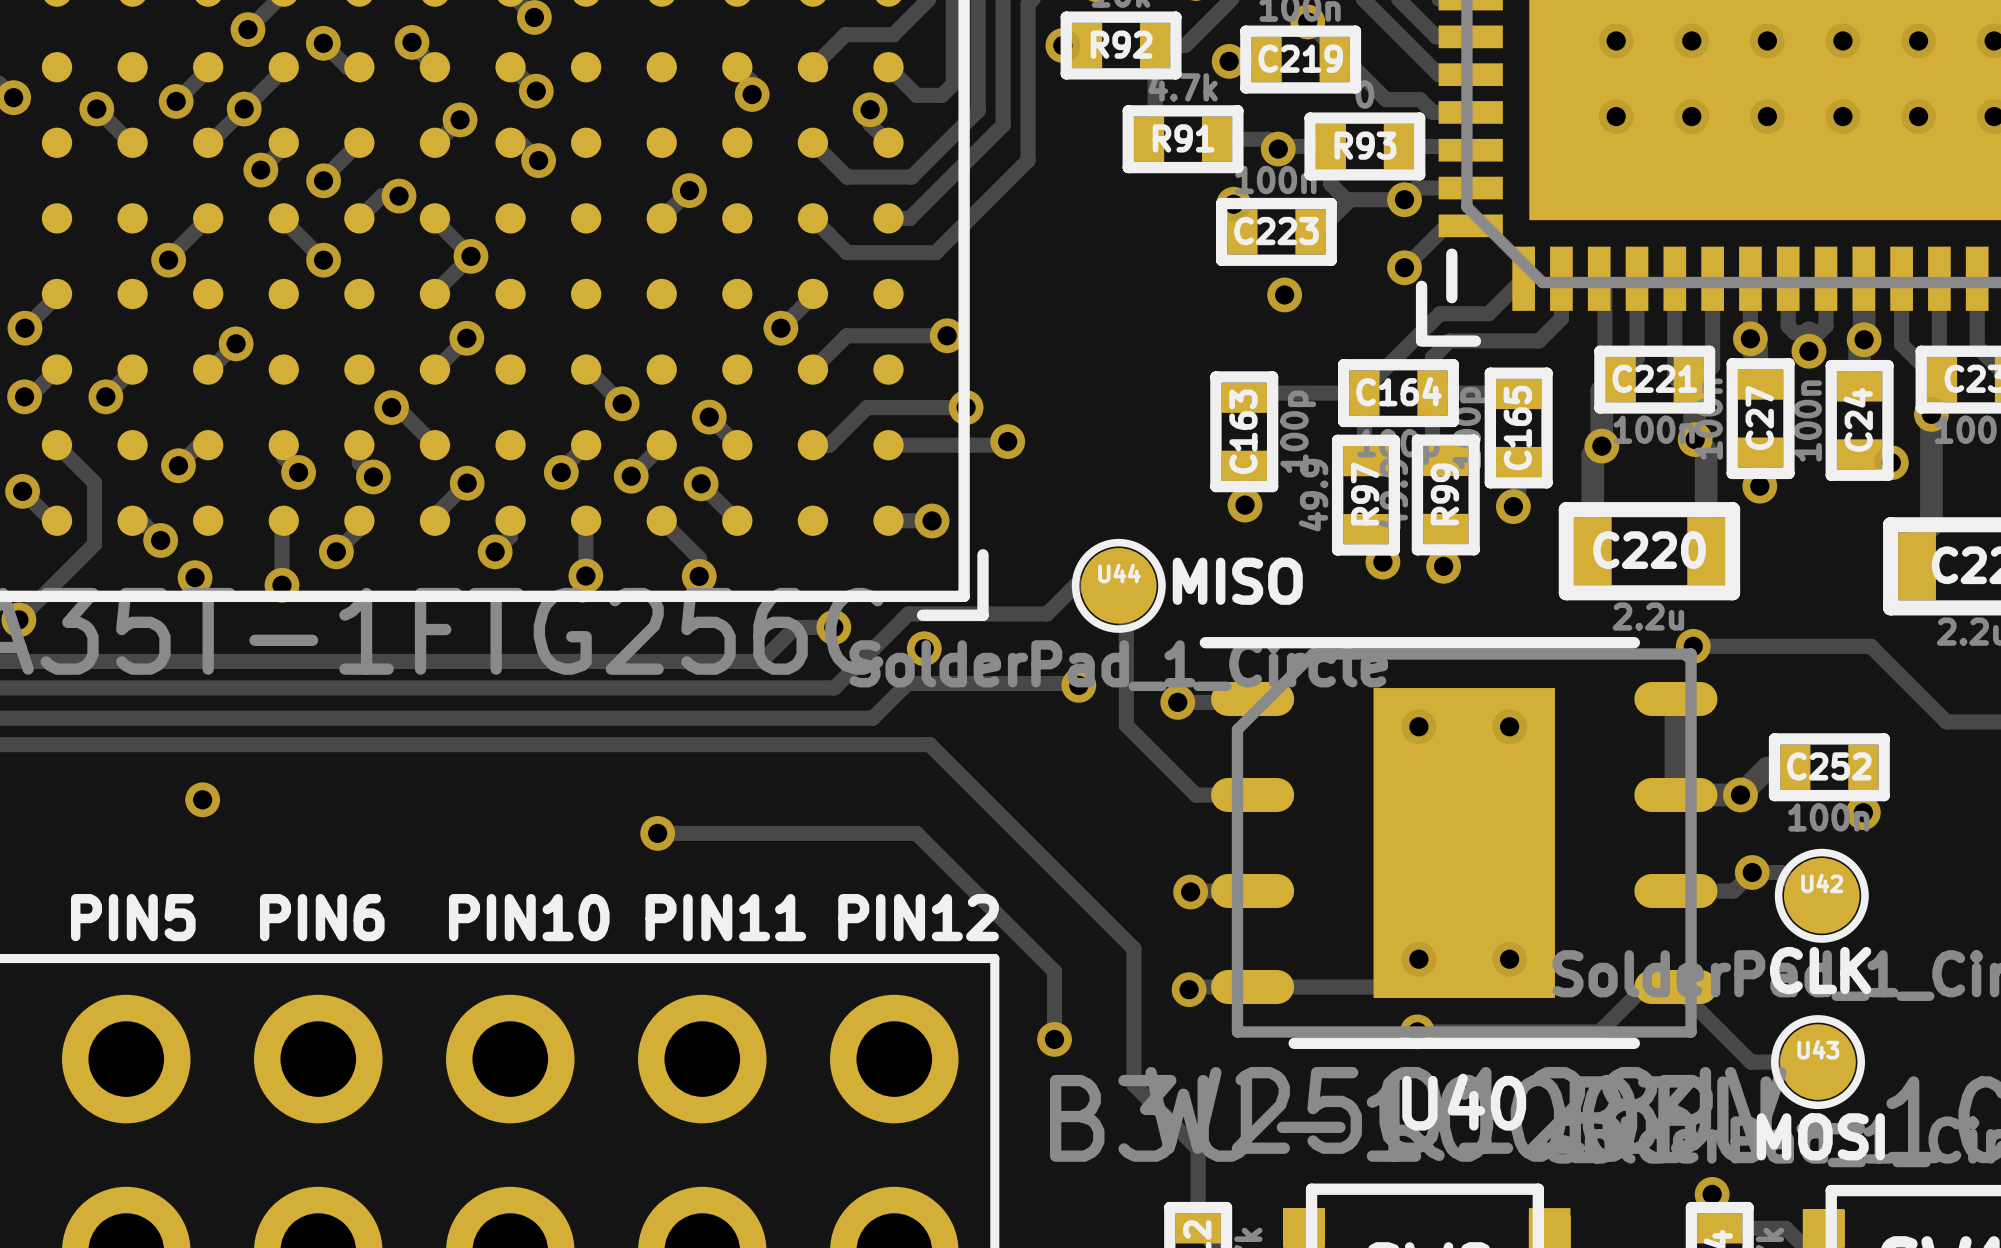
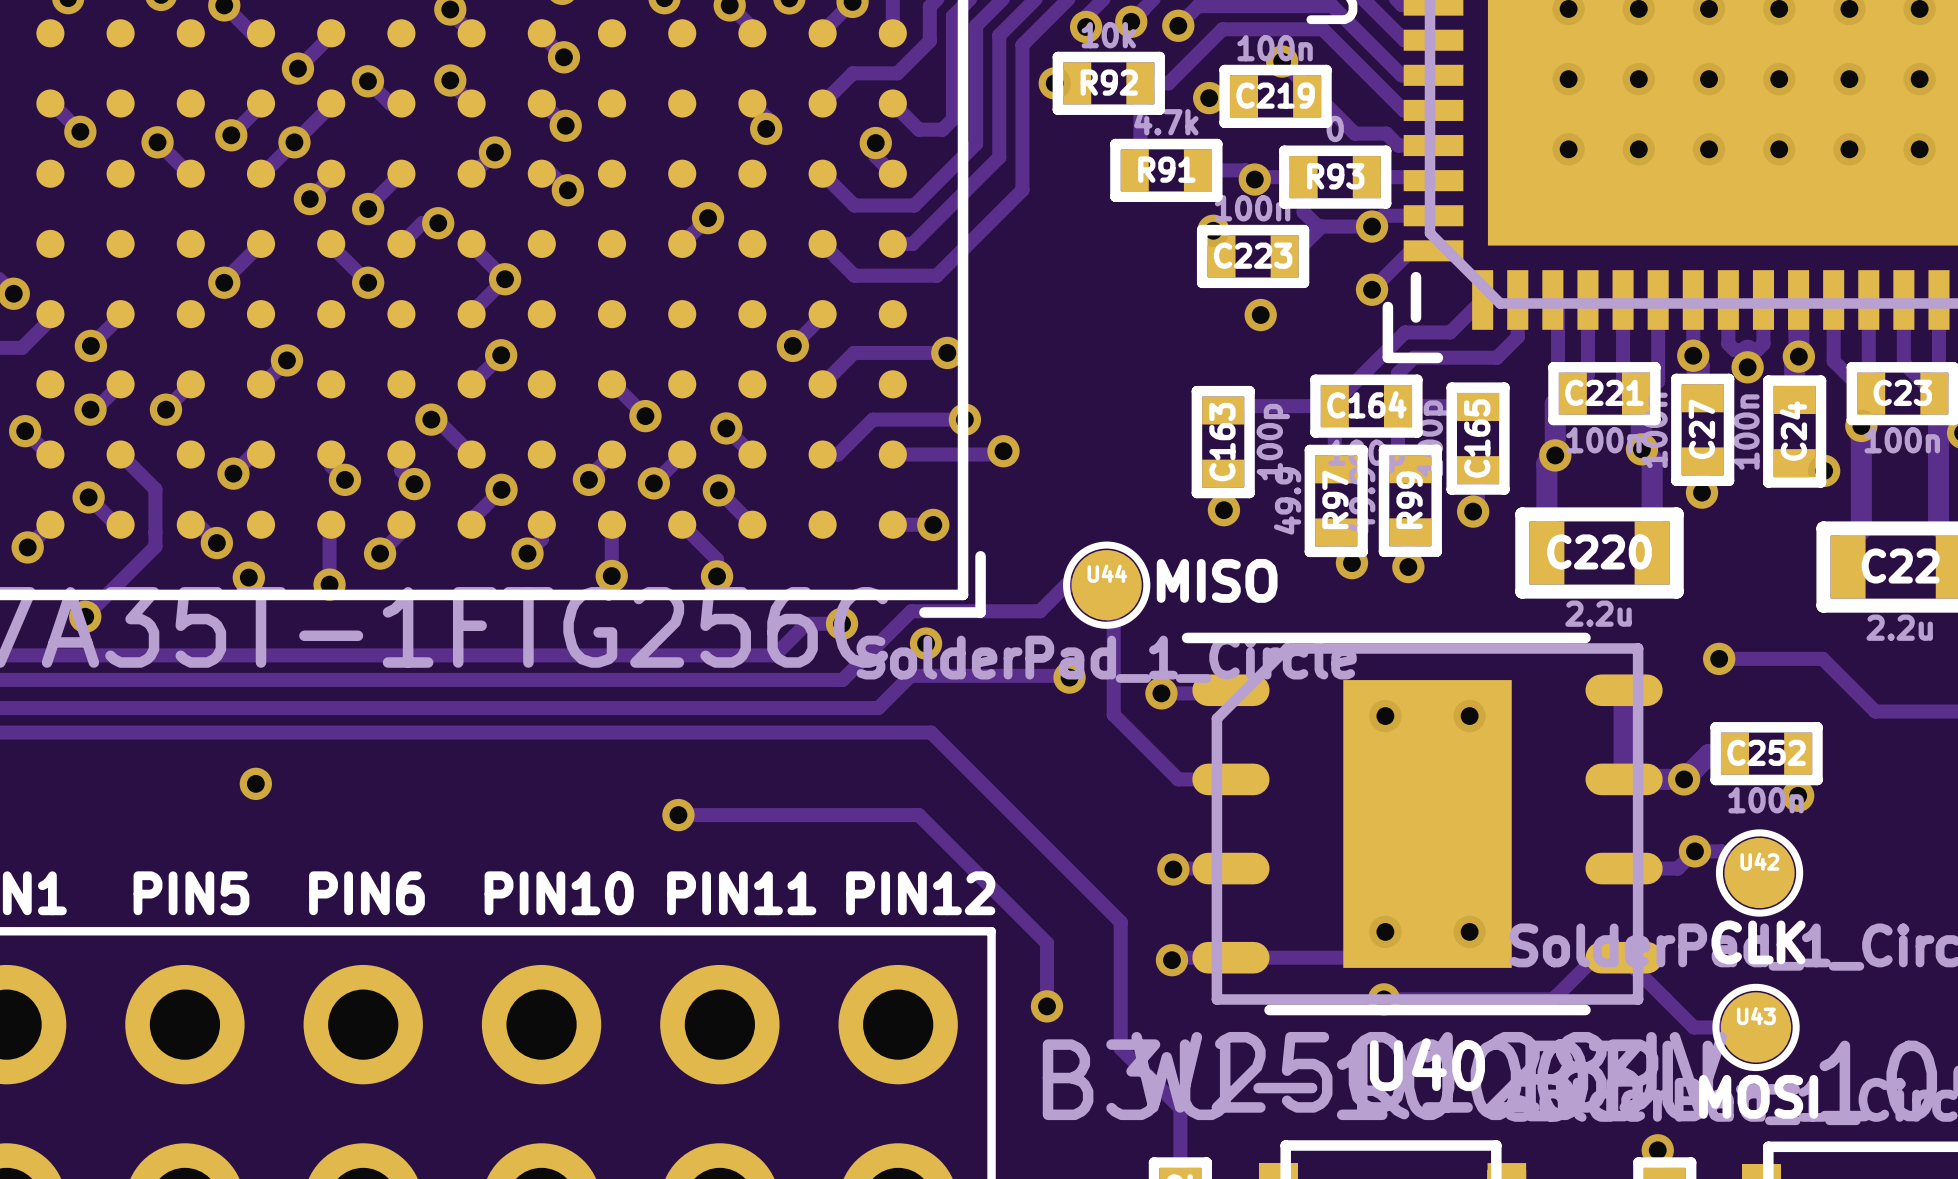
track: (1693, 646) (1870, 646) (1889, 665) -> (1719, 658) (1822, 658)
via position: (1693, 646) -> (1719, 658)

